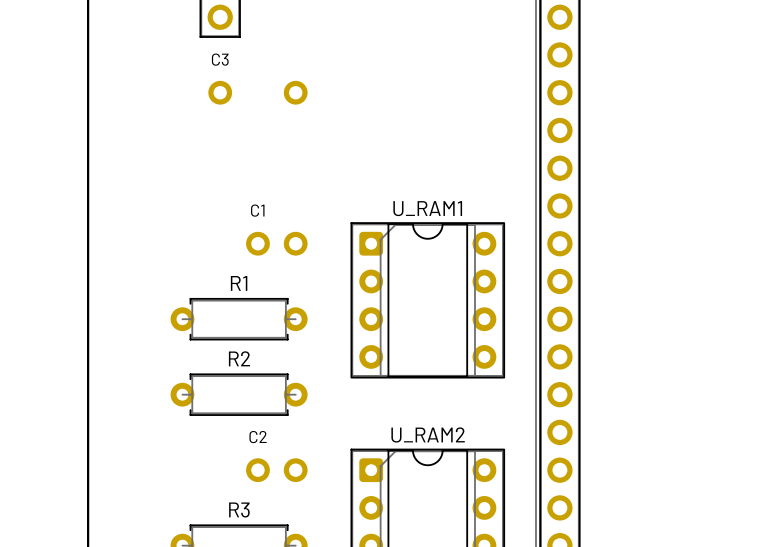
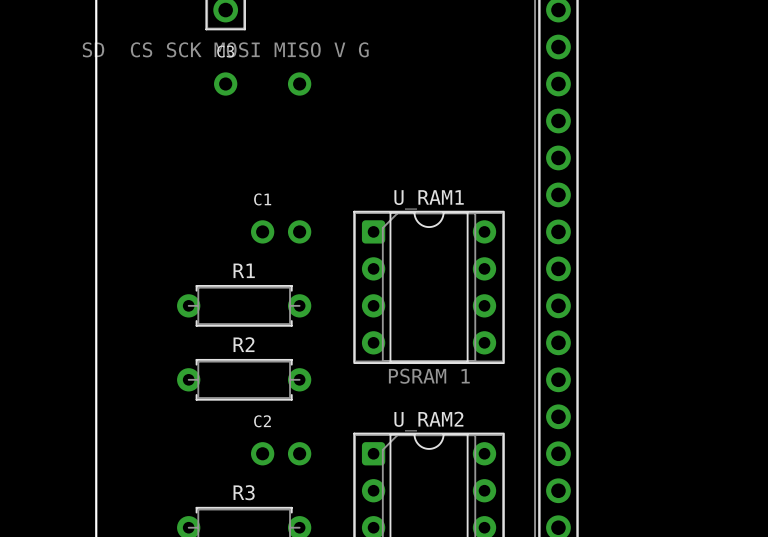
part value: none -> SD CS SCK MOSI MISO V G (225, 49)
U_RAM1 value: none -> PSRAM 1 (429, 376)

